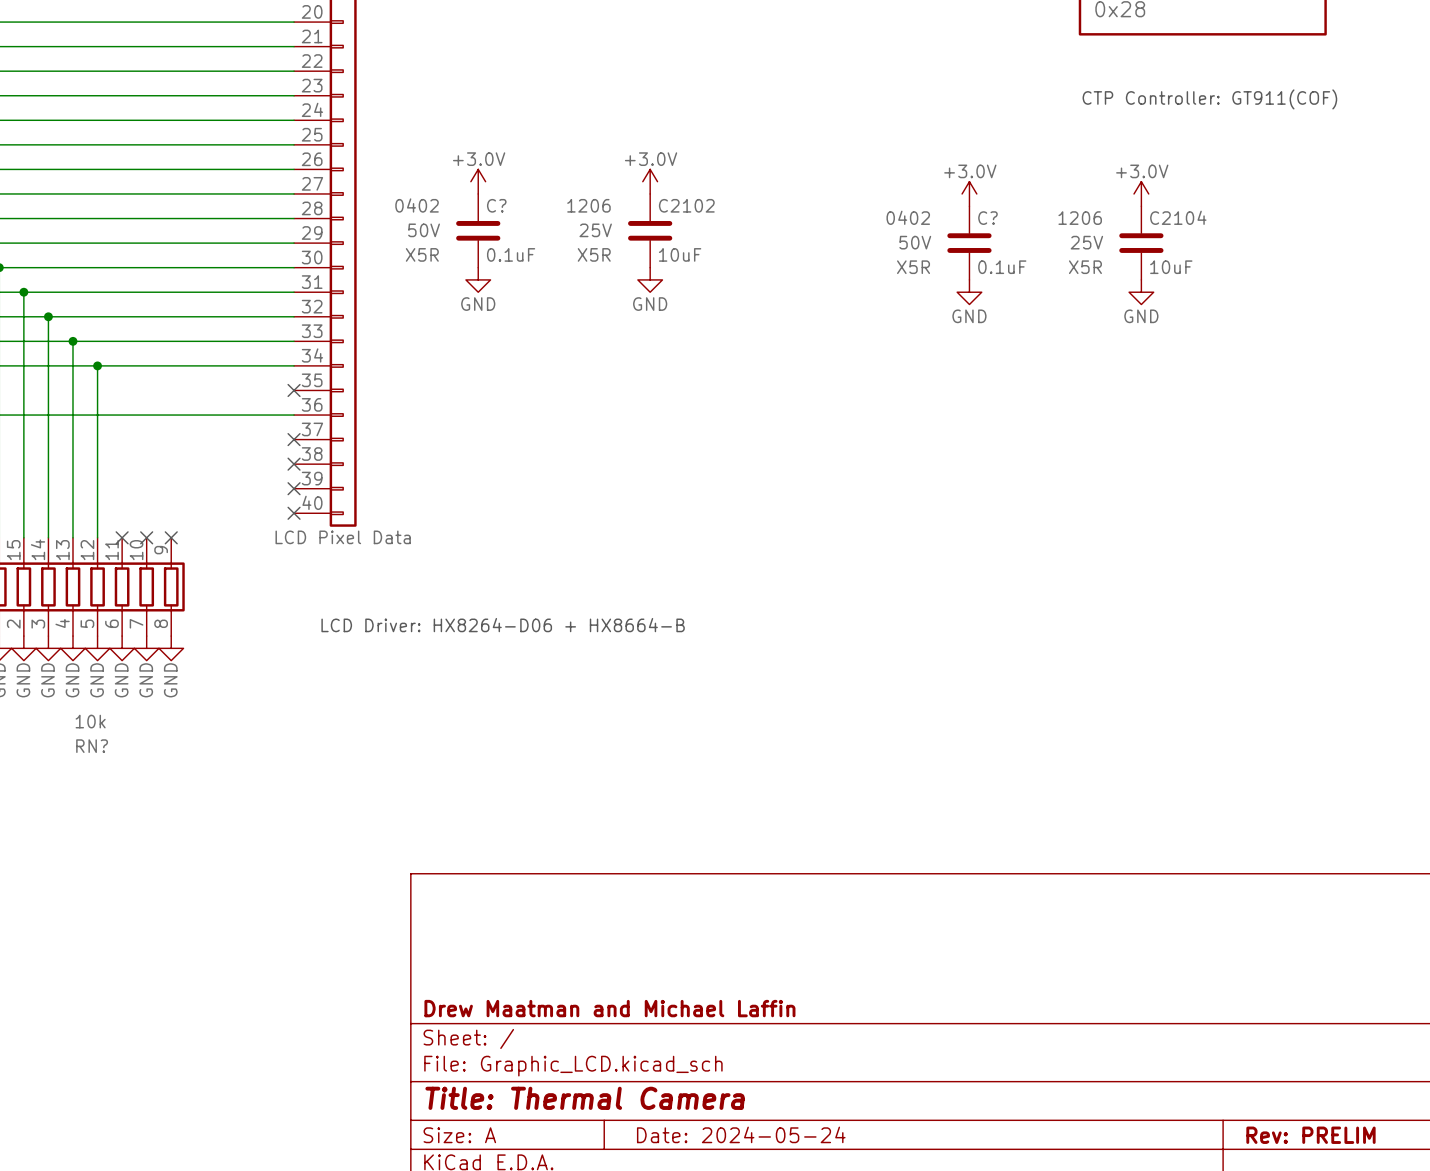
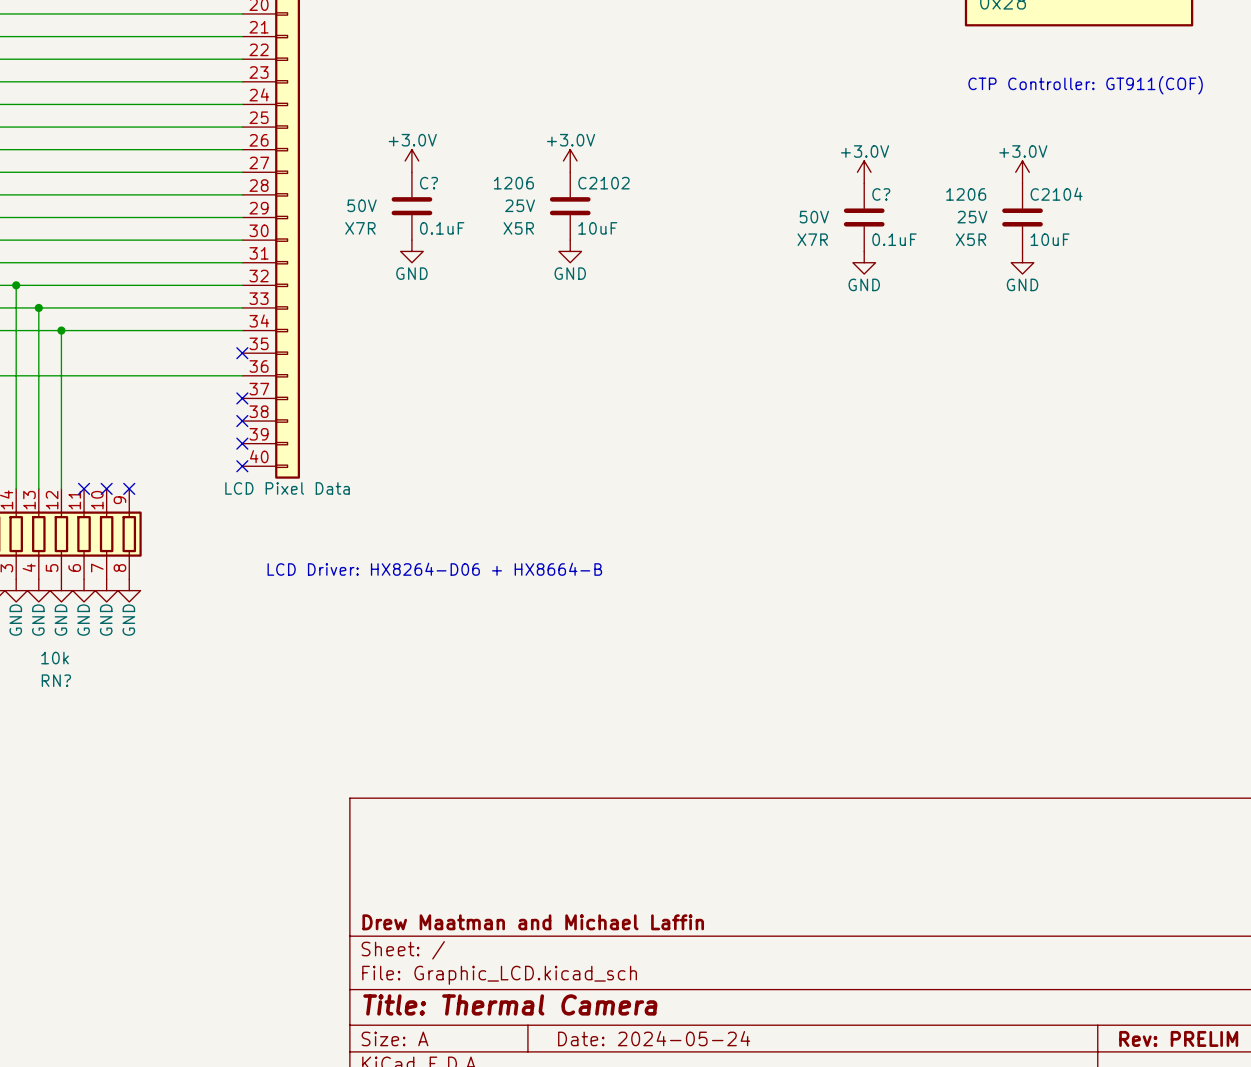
C? text: 0402 (417, 205) -> none
C? text: 0402 (908, 217) -> none
C? text: X5R (422, 254) -> X7R (360, 228)
C? text: X5R (913, 267) -> X7R (812, 239)

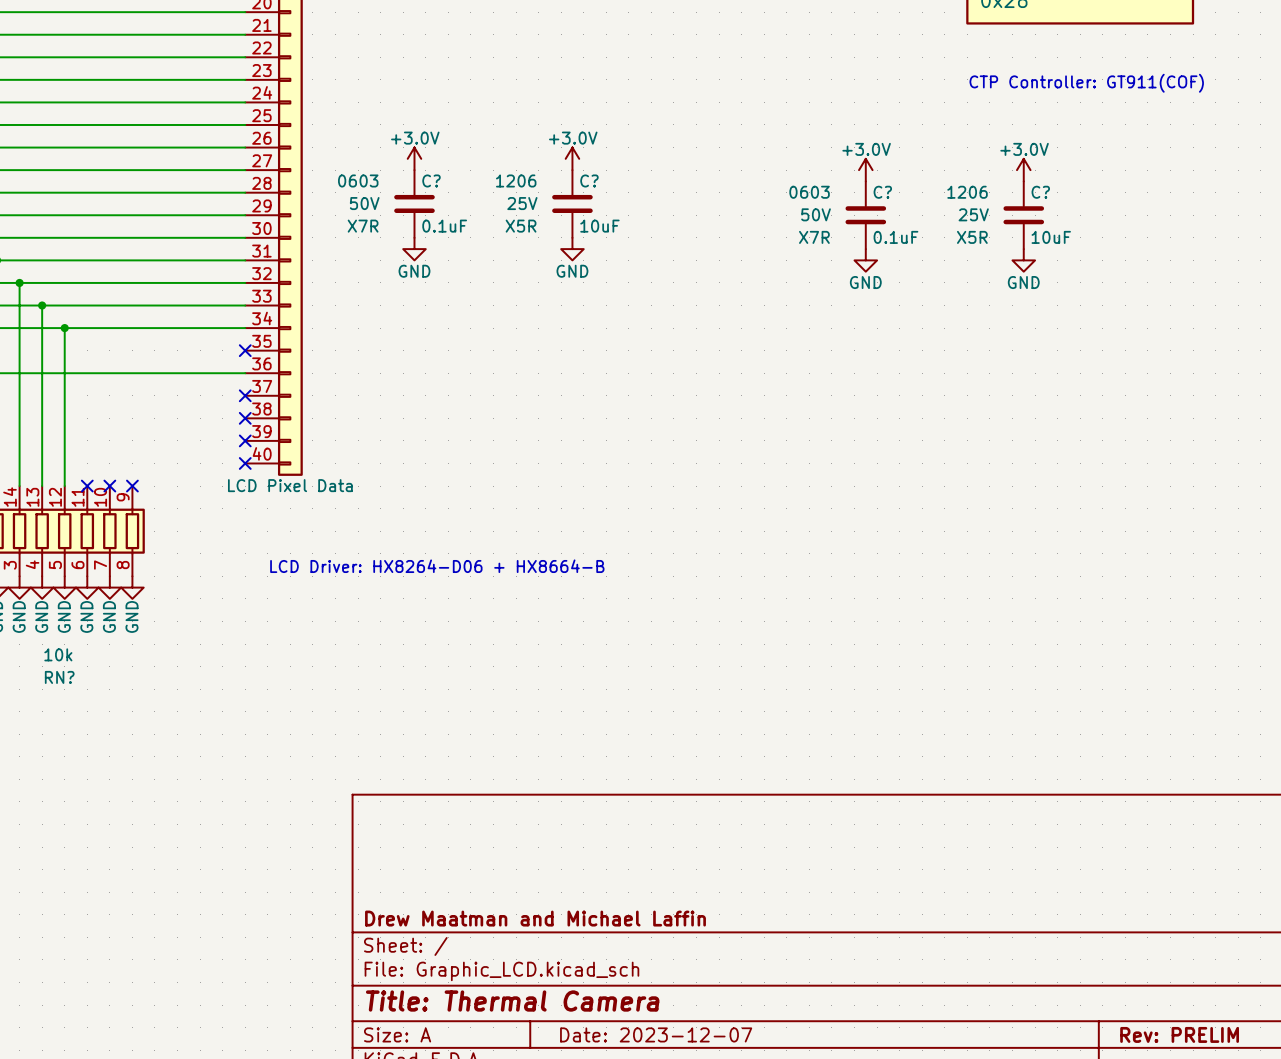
C? text: none -> 0603 (358, 180)
C2102 name: C2102 (603, 183) -> C? (589, 180)
C? text: none -> 0603 (809, 192)
C2104 name: C2104 (1056, 194) -> C? (1040, 192)
title block: Date: 2024-05-24 (654, 1038) -> Date: 2023-12-07 (656, 1034)

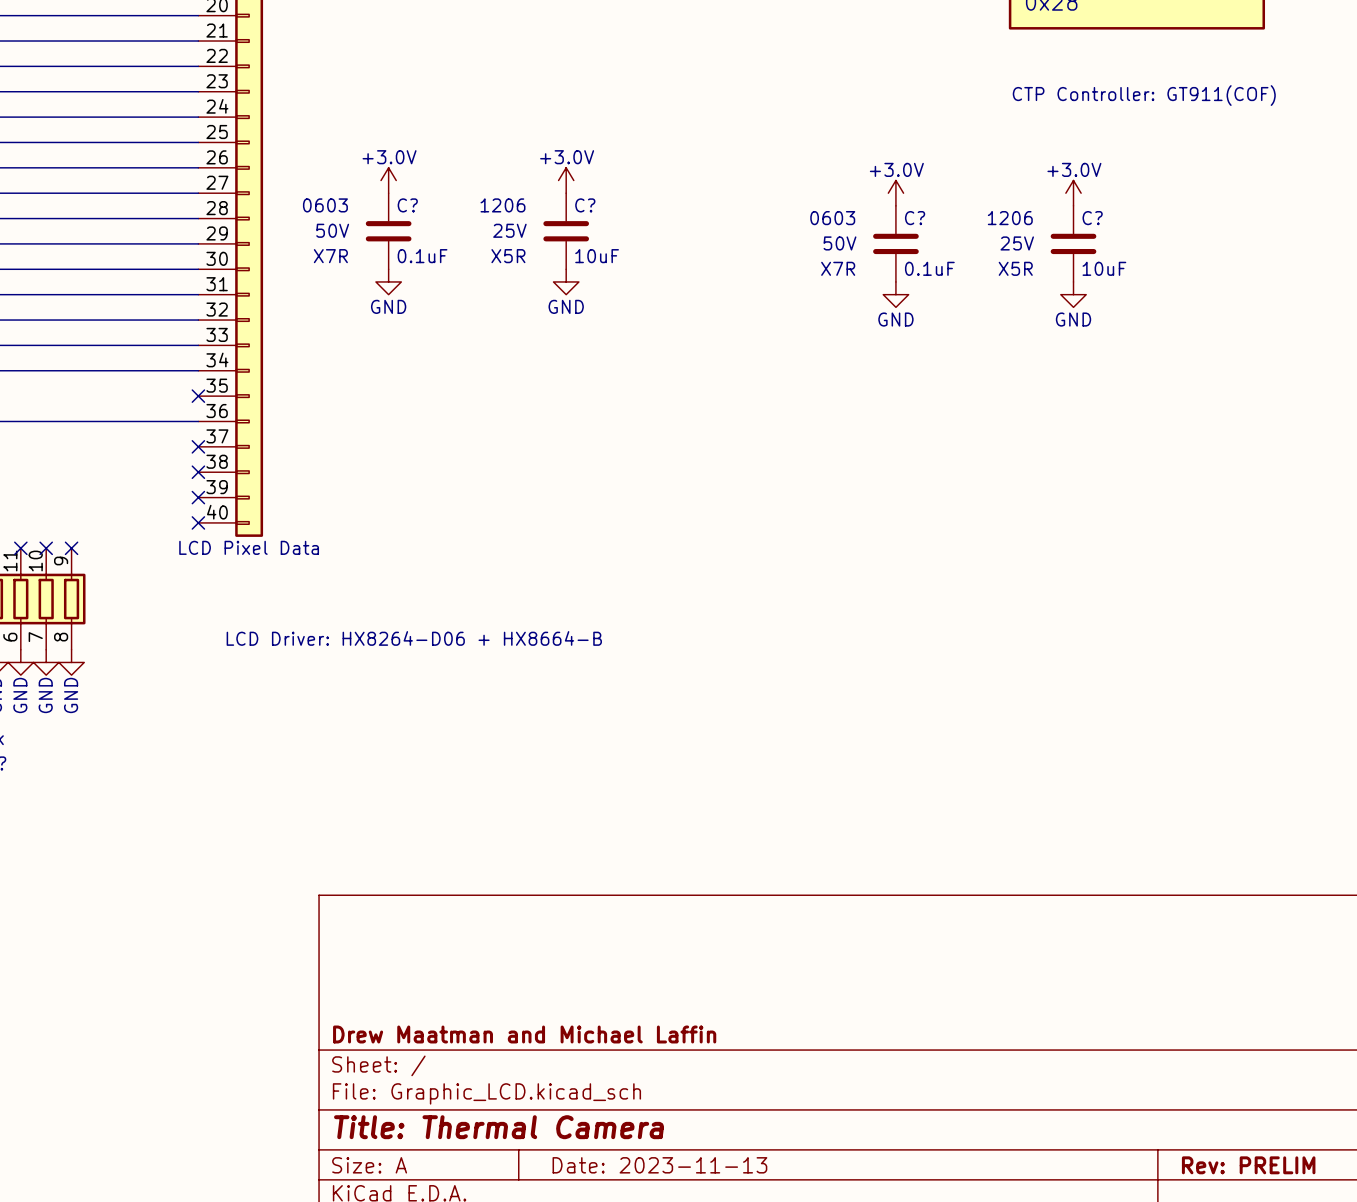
title block: Date: 2023-12-07 (656, 1034) -> Date: 2023-11-13 (659, 1165)

